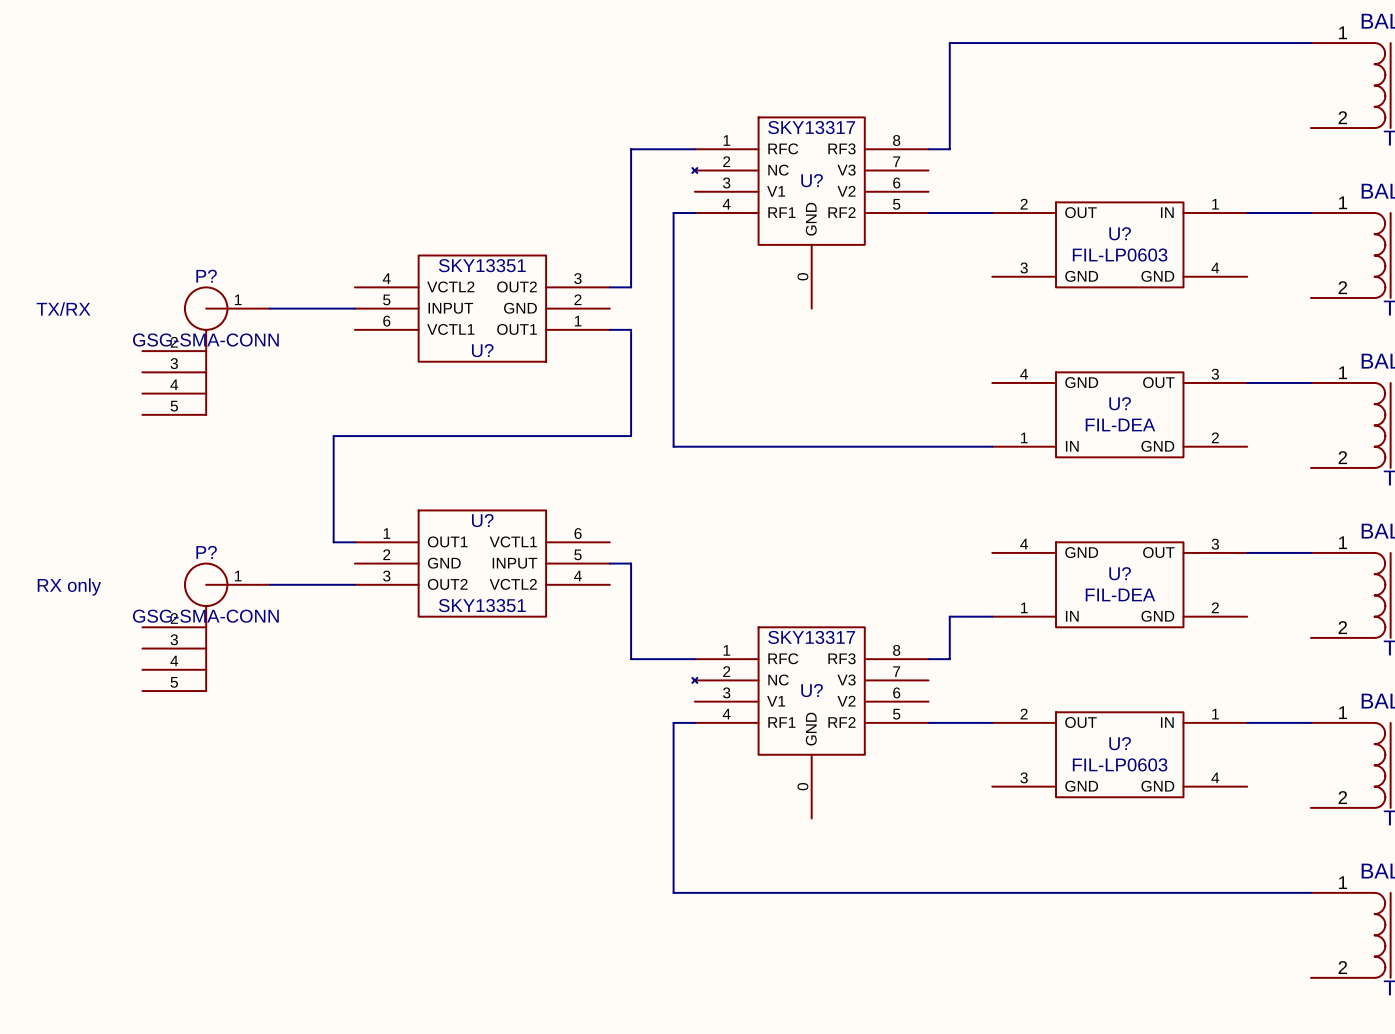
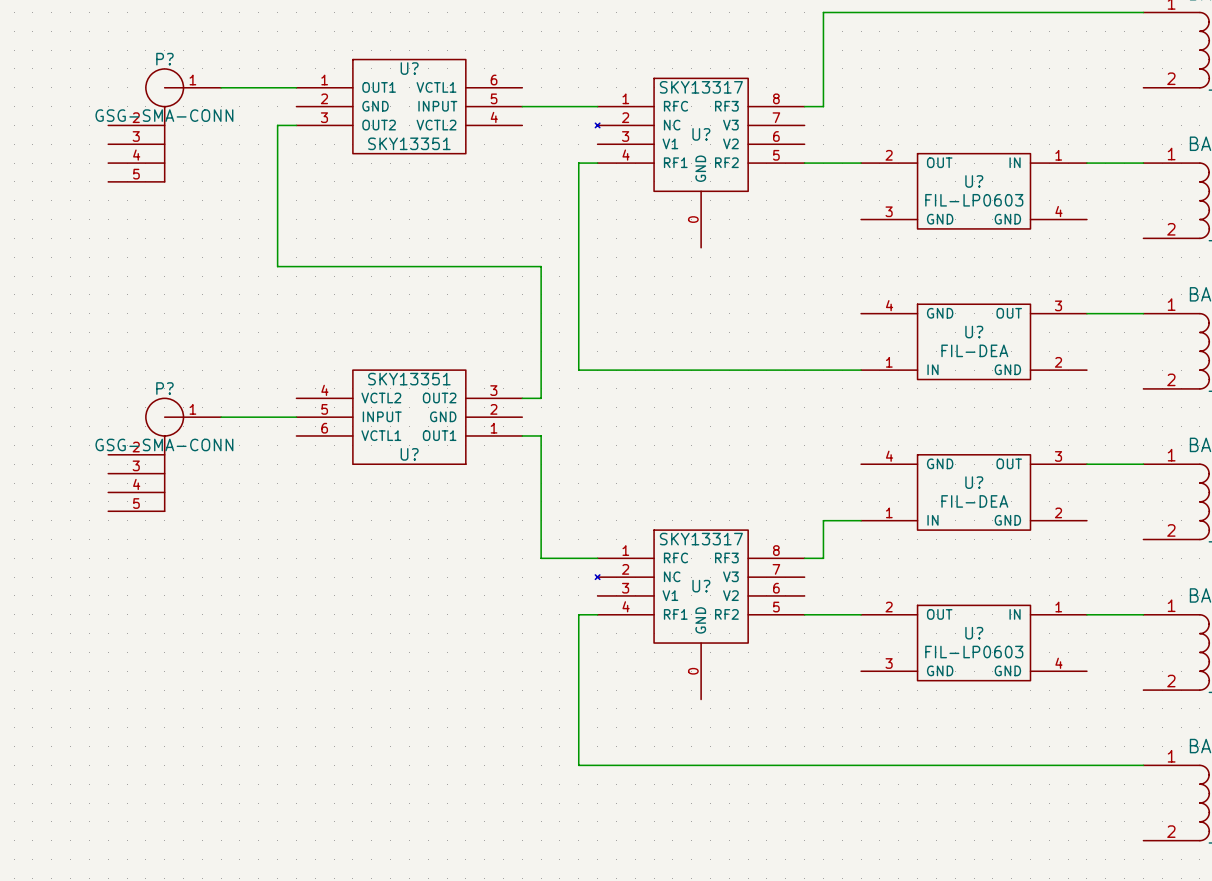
U?: none -> SKY13351 (409, 106)
wire: (631, 149) (631, 287) (609, 287) -> (541, 106) (522, 106)
P?: none -> GSG-SMA-CONN (164, 125)
wire: none -> (296, 125) (277, 125) (277, 266) (522, 266)
text: TX/RX (63, 308) -> none
wire: (269, 308) (354, 308) -> (221, 87) (296, 87)
U?: SKY13351 (482, 308) -> none
P?: GSG-SMA-CONN (206, 351) -> none
wire: (631, 436) (333, 436) (333, 542) (354, 542) -> (541, 360) (541, 398) (522, 398)
U? rotation: 0° (482, 563) -> 180° (409, 417)
wire: (609, 563) (631, 563) -> (522, 435) (541, 435) (541, 473)
wire: (269, 584) (354, 584) -> (221, 417) (296, 417)
text: RX only (69, 586) -> none
P? position: (206, 627) -> (164, 454)

